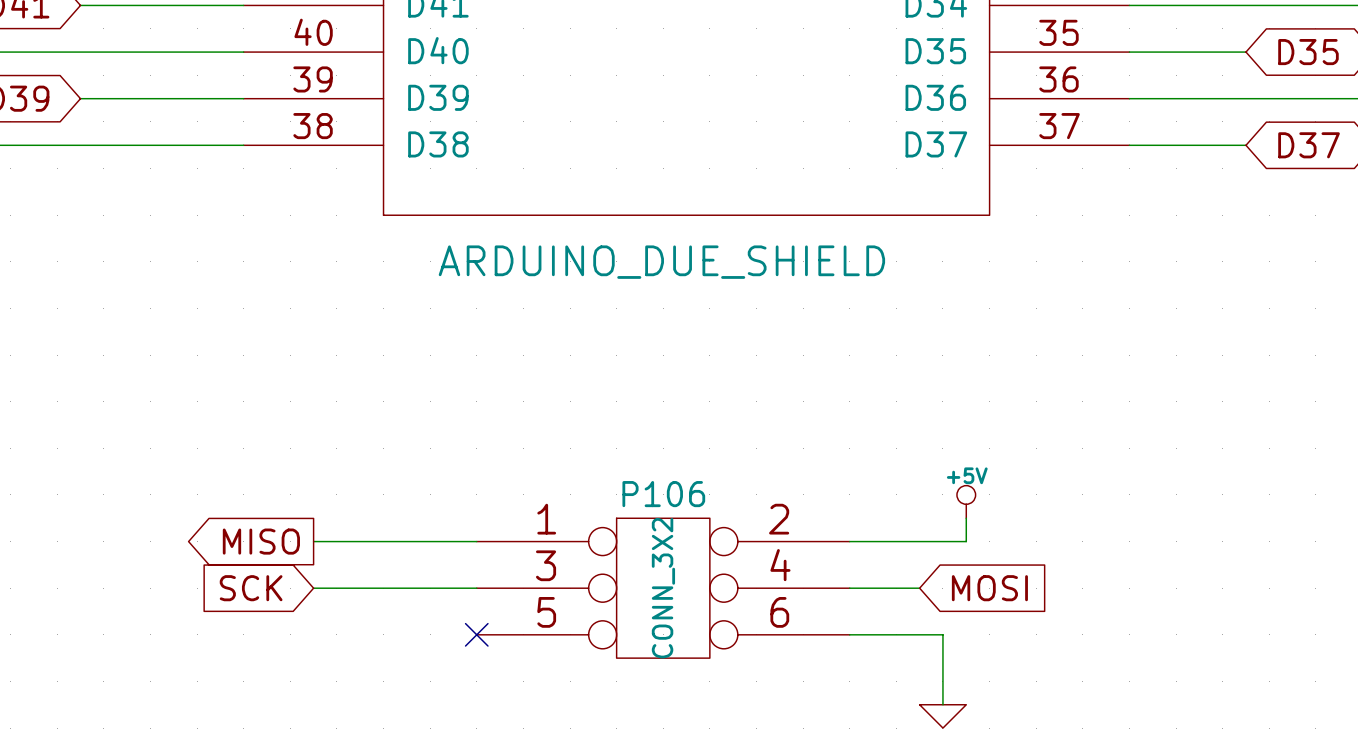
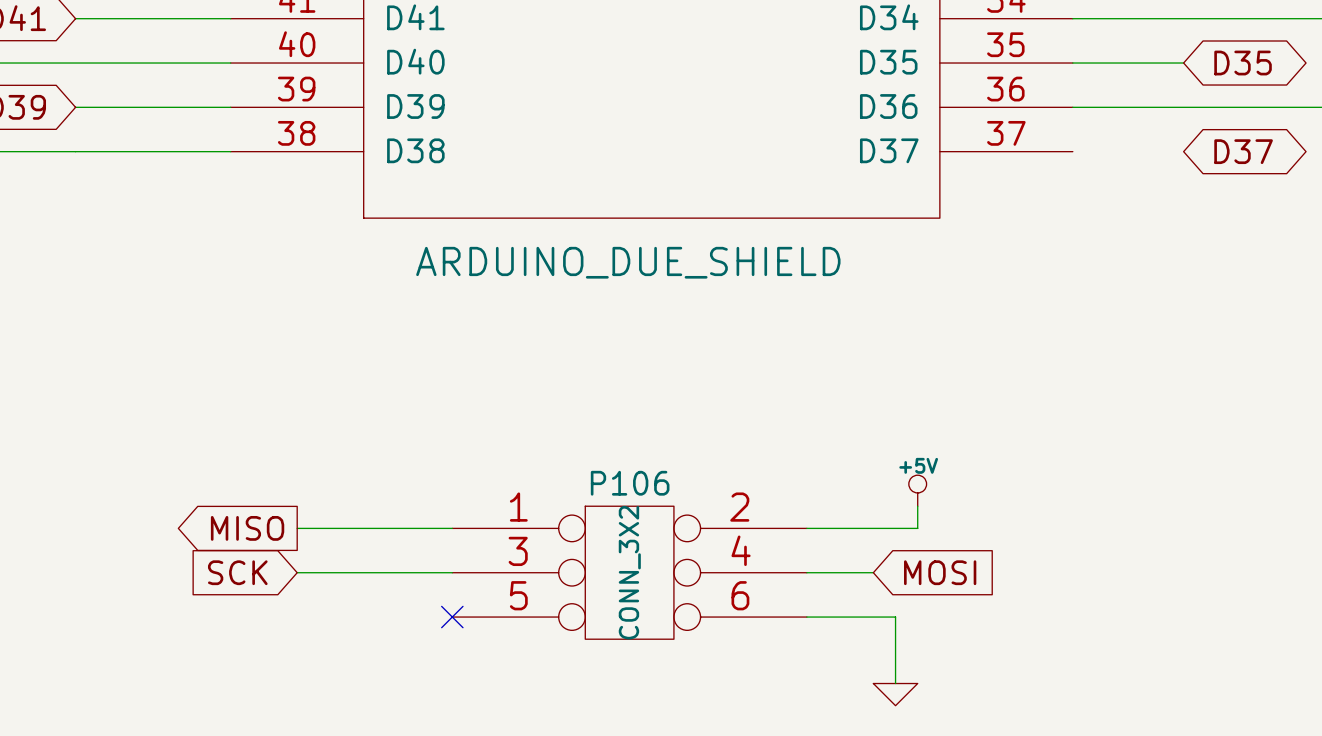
wire: (1129, 145) (1246, 145) -> none

